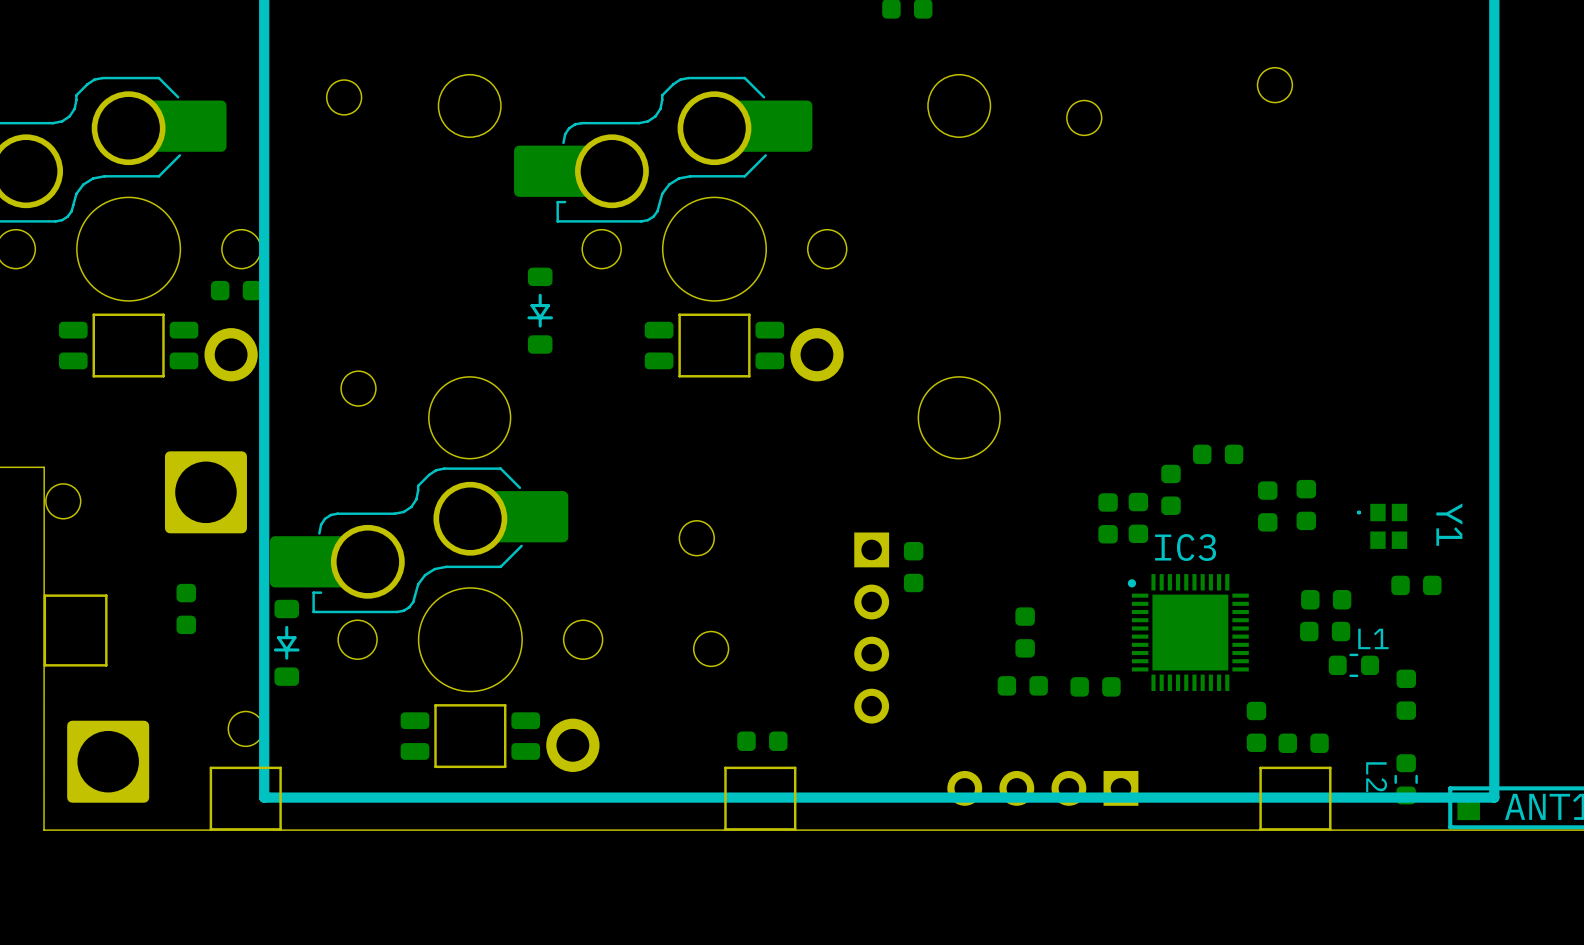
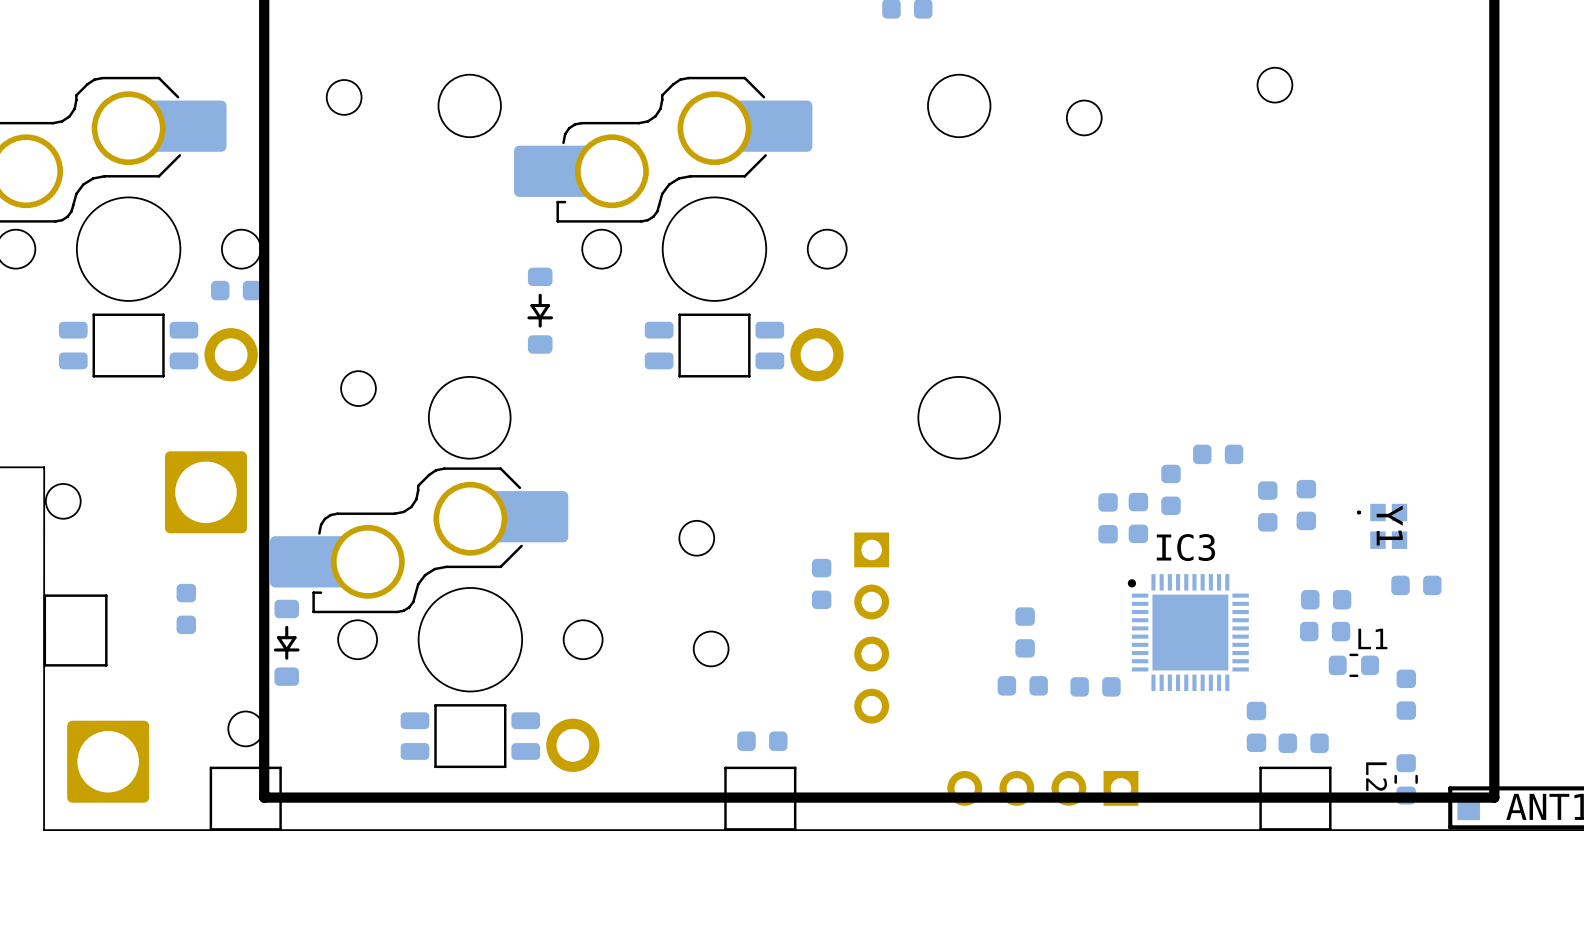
Y1 name position: Y1 (1449, 524) -> Y1 (1389, 525)
part position: (913, 567) -> (821, 583)

